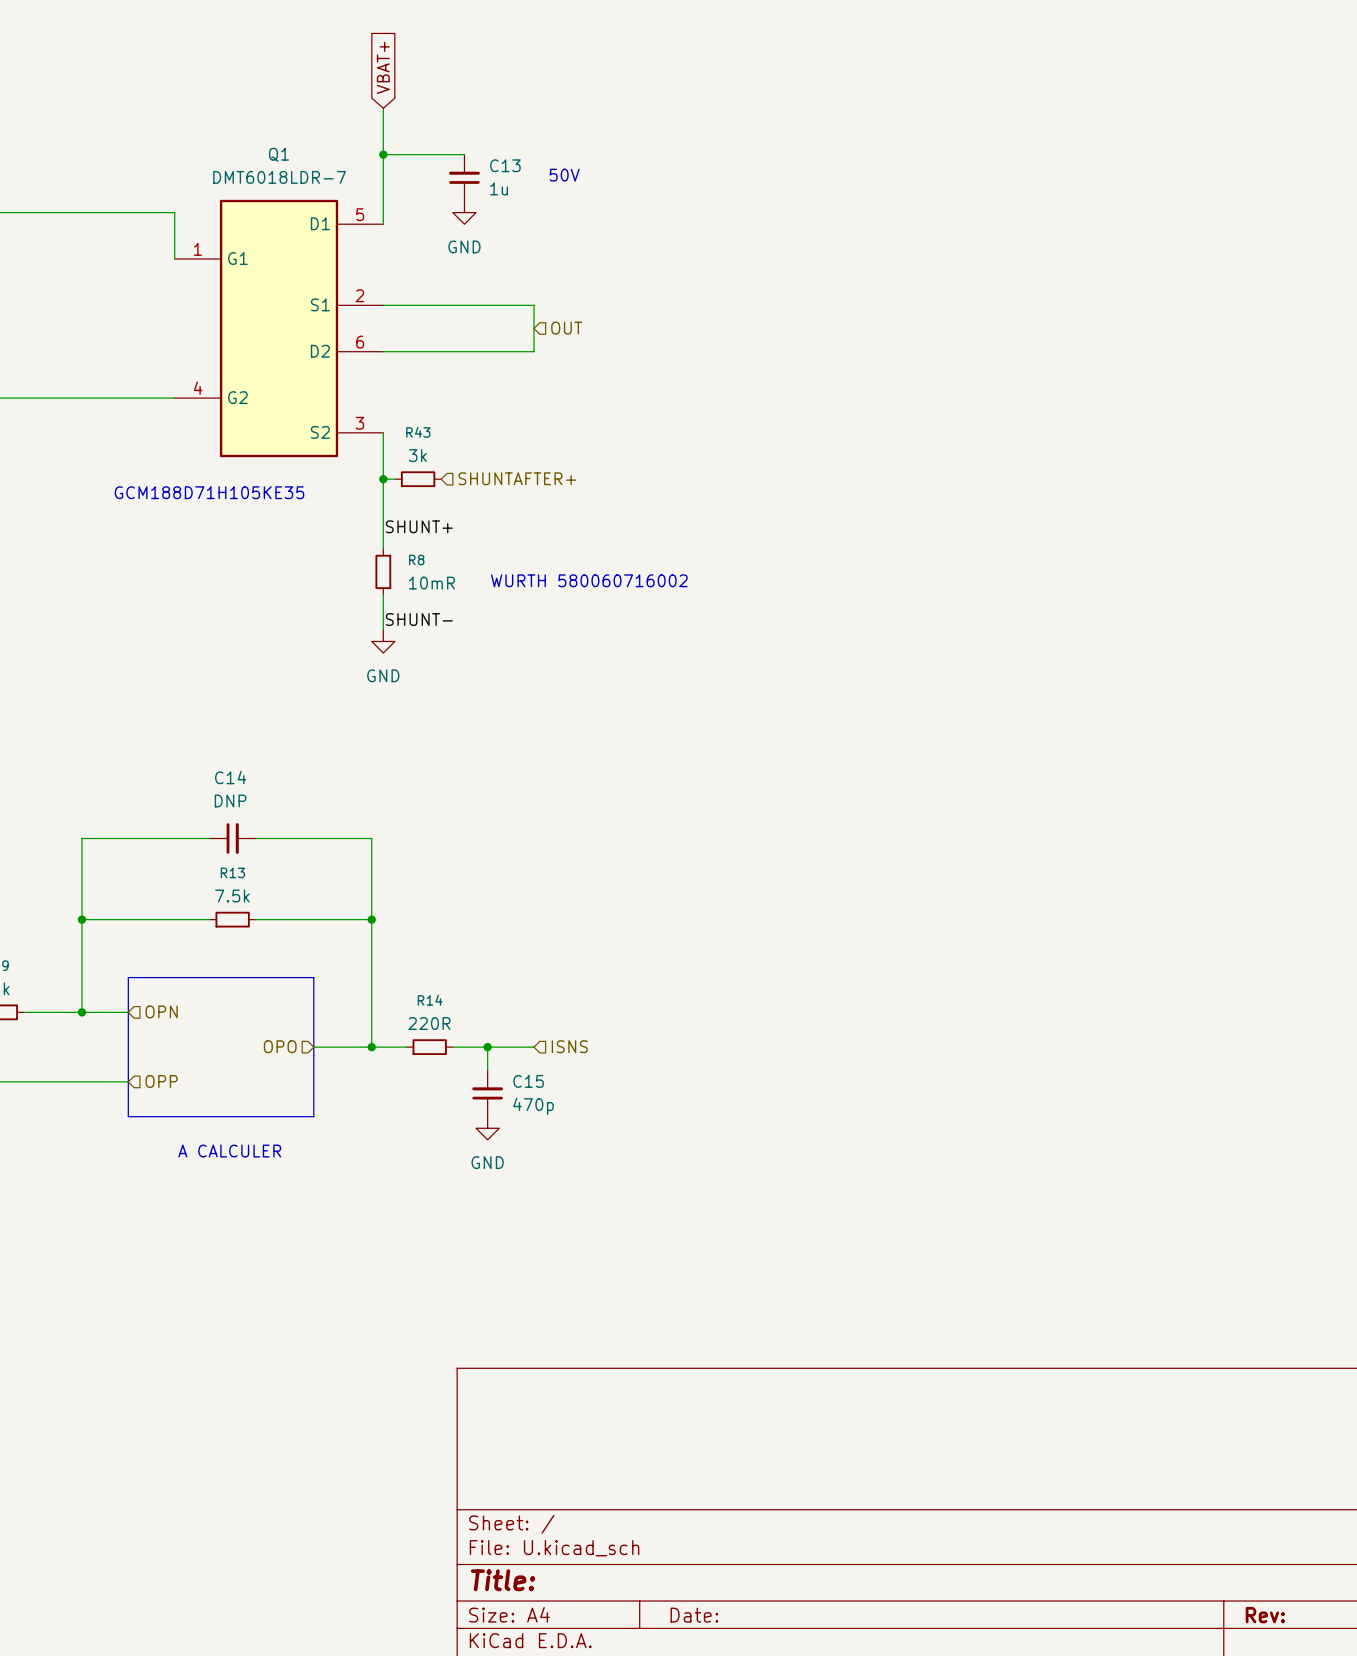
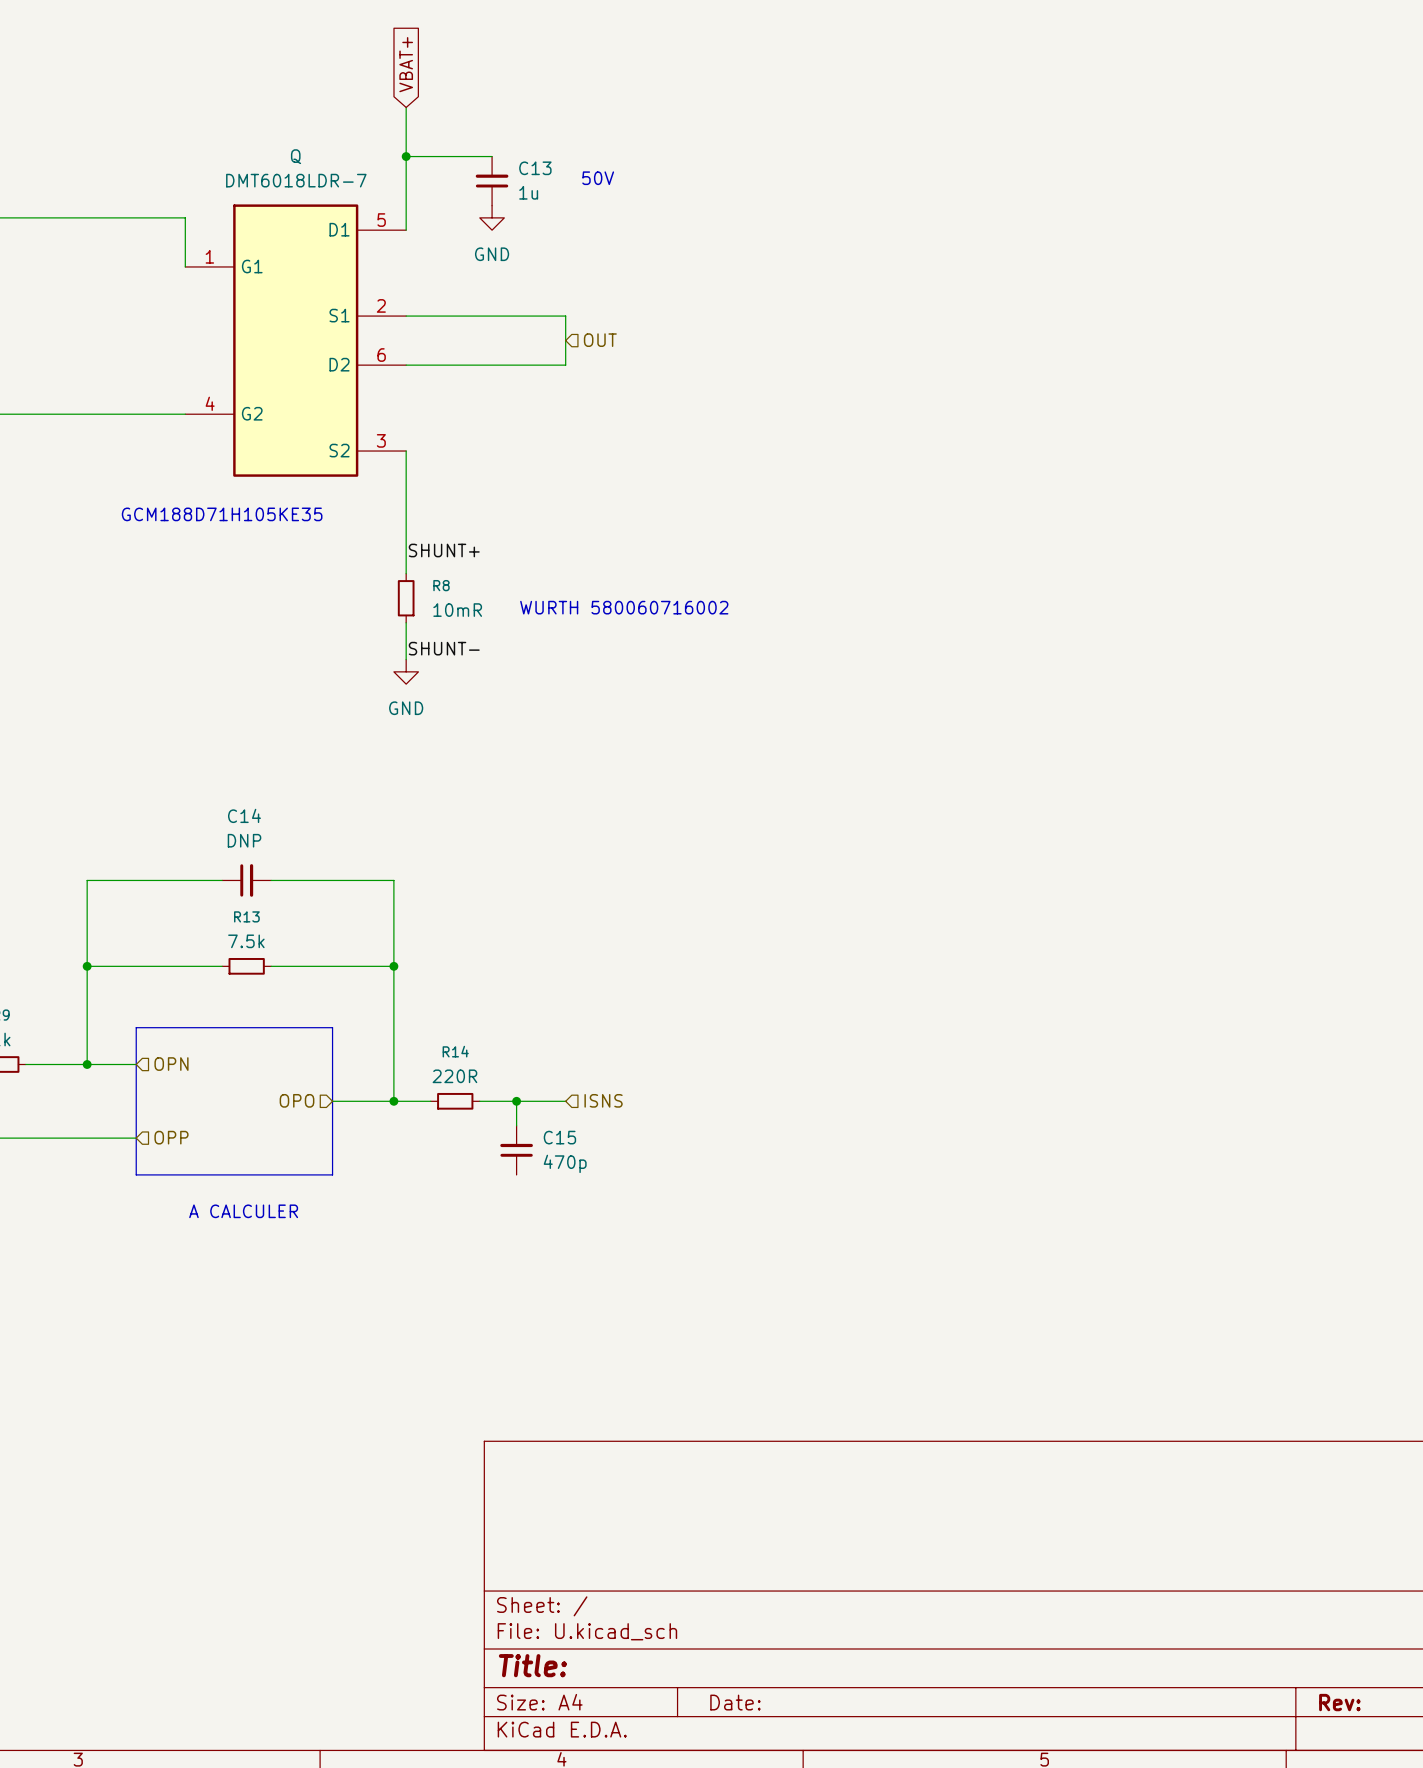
Q1 name: Q1 (279, 154) -> Q (296, 156)
hierarchical label: SHUNTAFTER+ (517, 478) -> none
wire: (383, 479) (394, 479) -> none
junction: (383, 479) -> none
R43: 3k (418, 479) -> none
power symbol: GND (487, 1128) -> none

